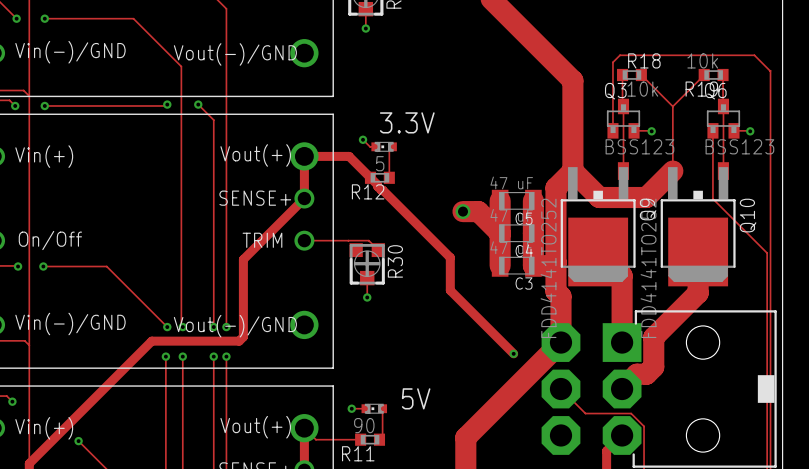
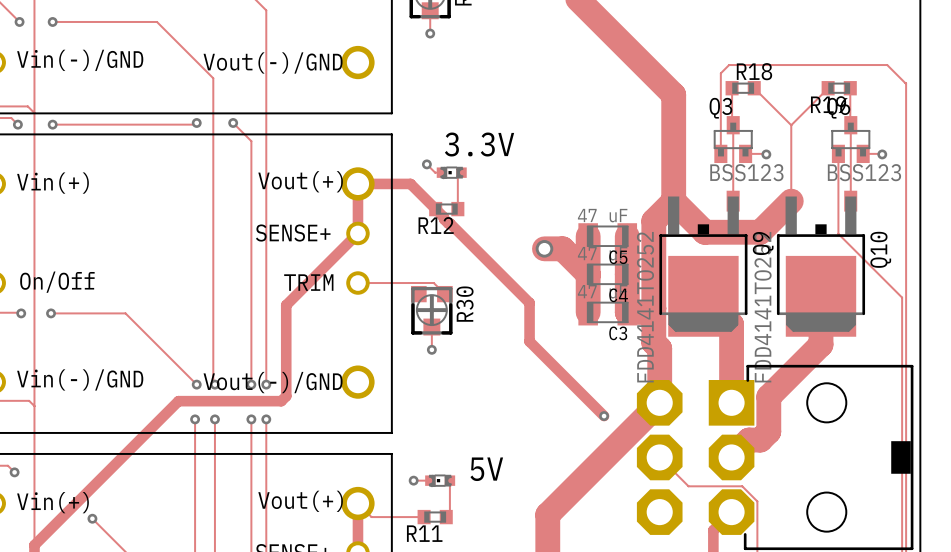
R19 value: 10k (702, 60) -> none
R18 value: 10k (642, 89) -> none
R12 value: 5 (380, 163) -> none
R11 value: 90 (364, 425) -> none

